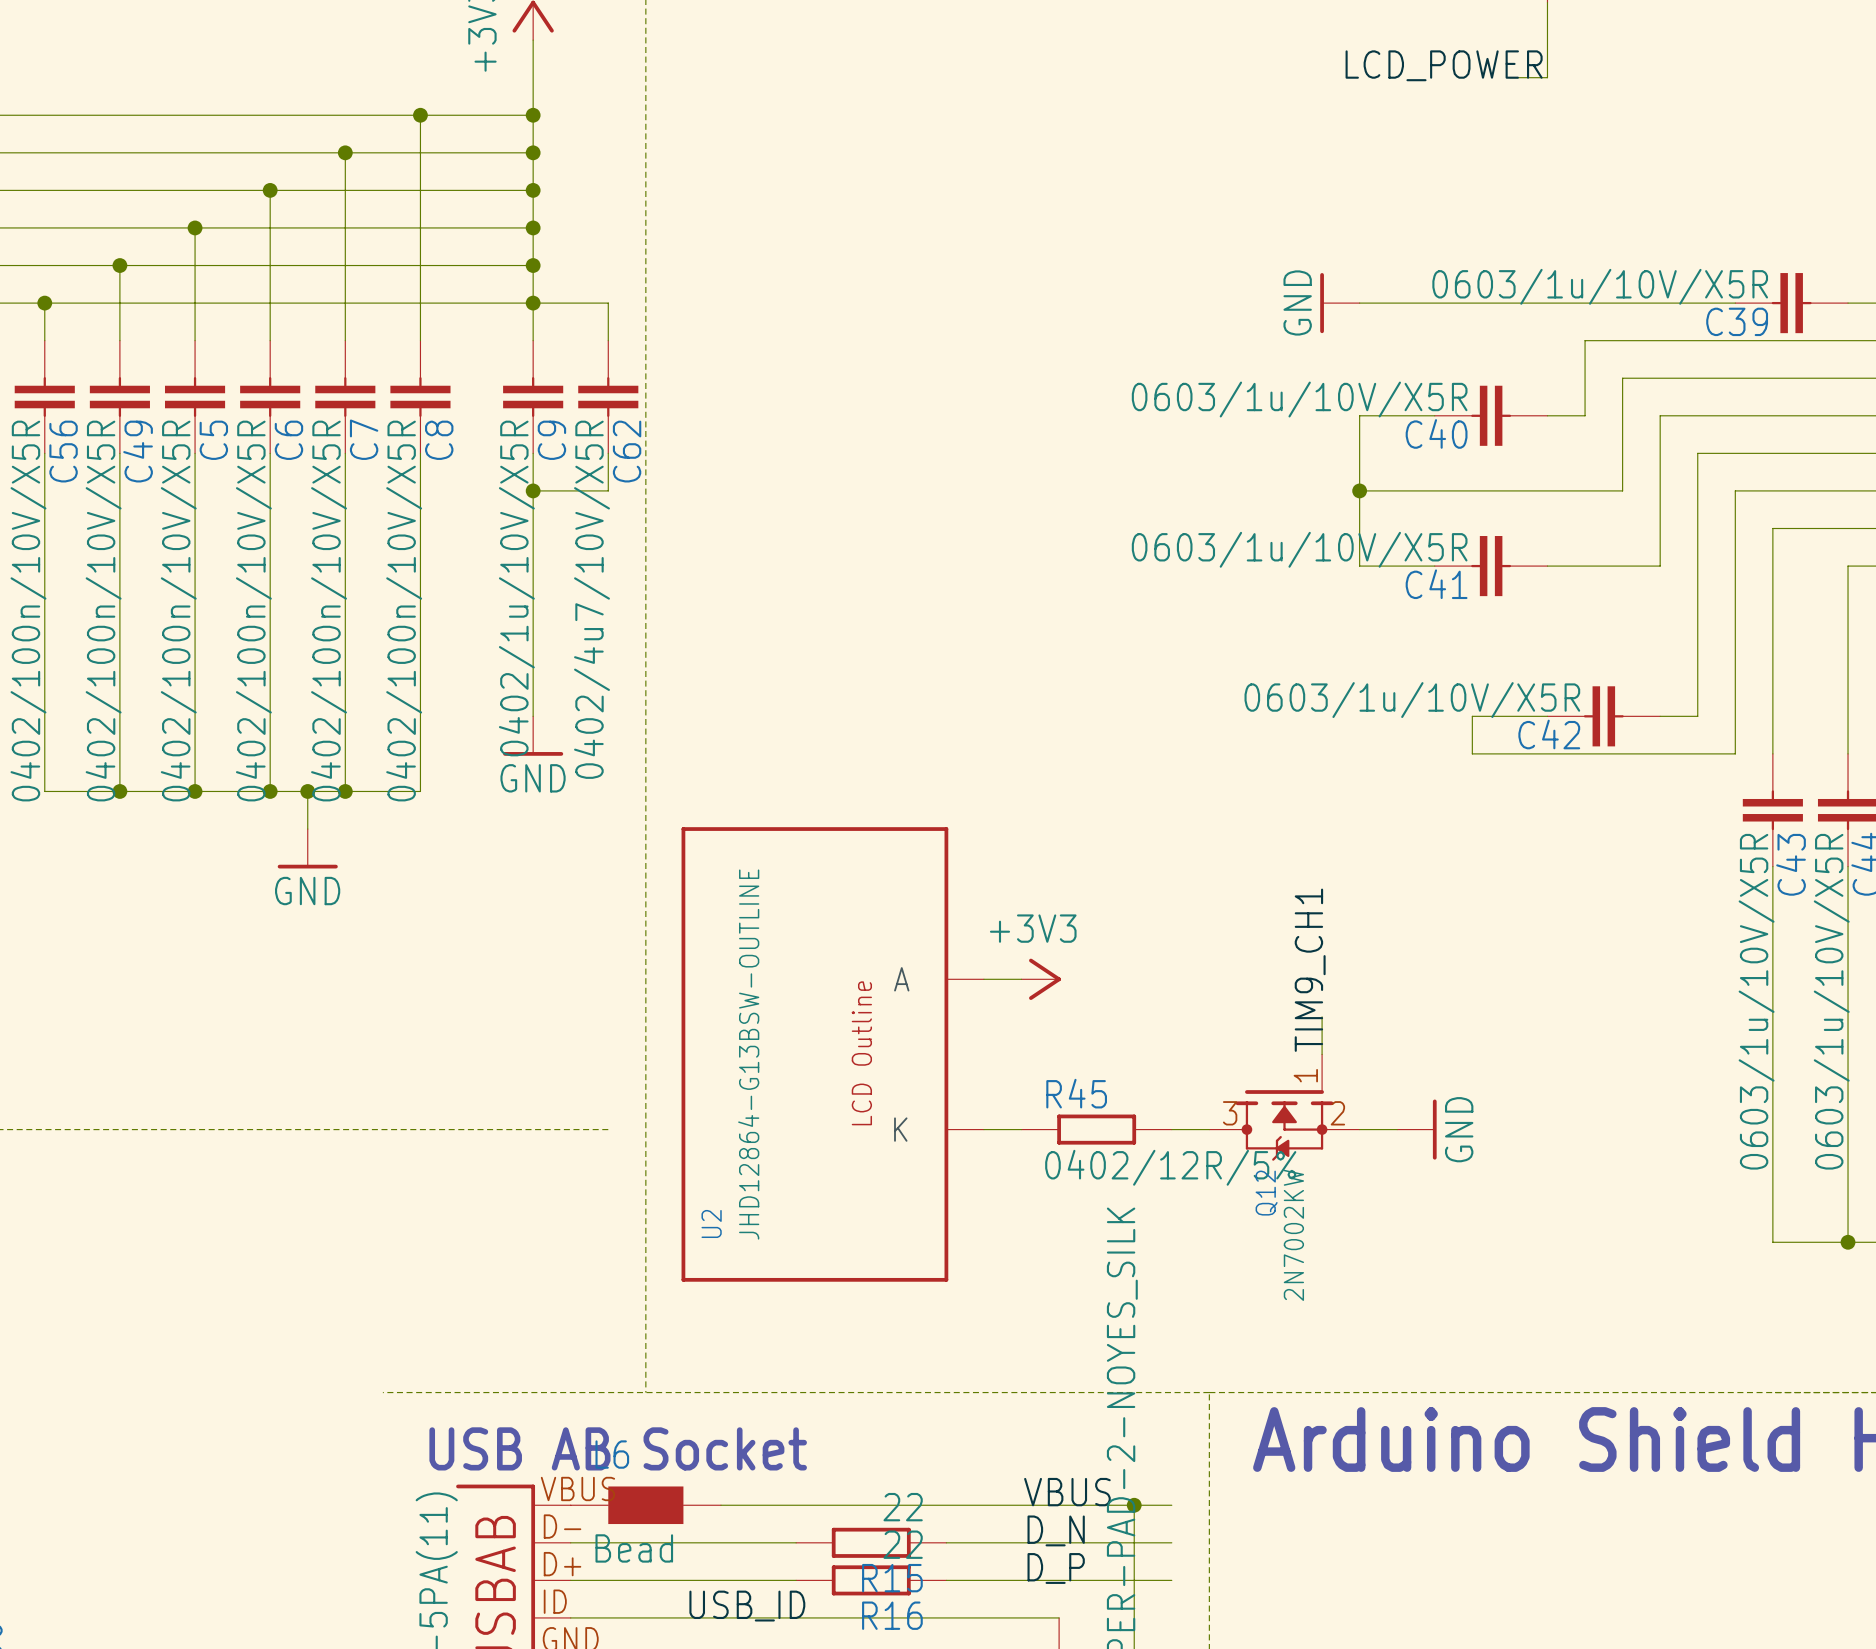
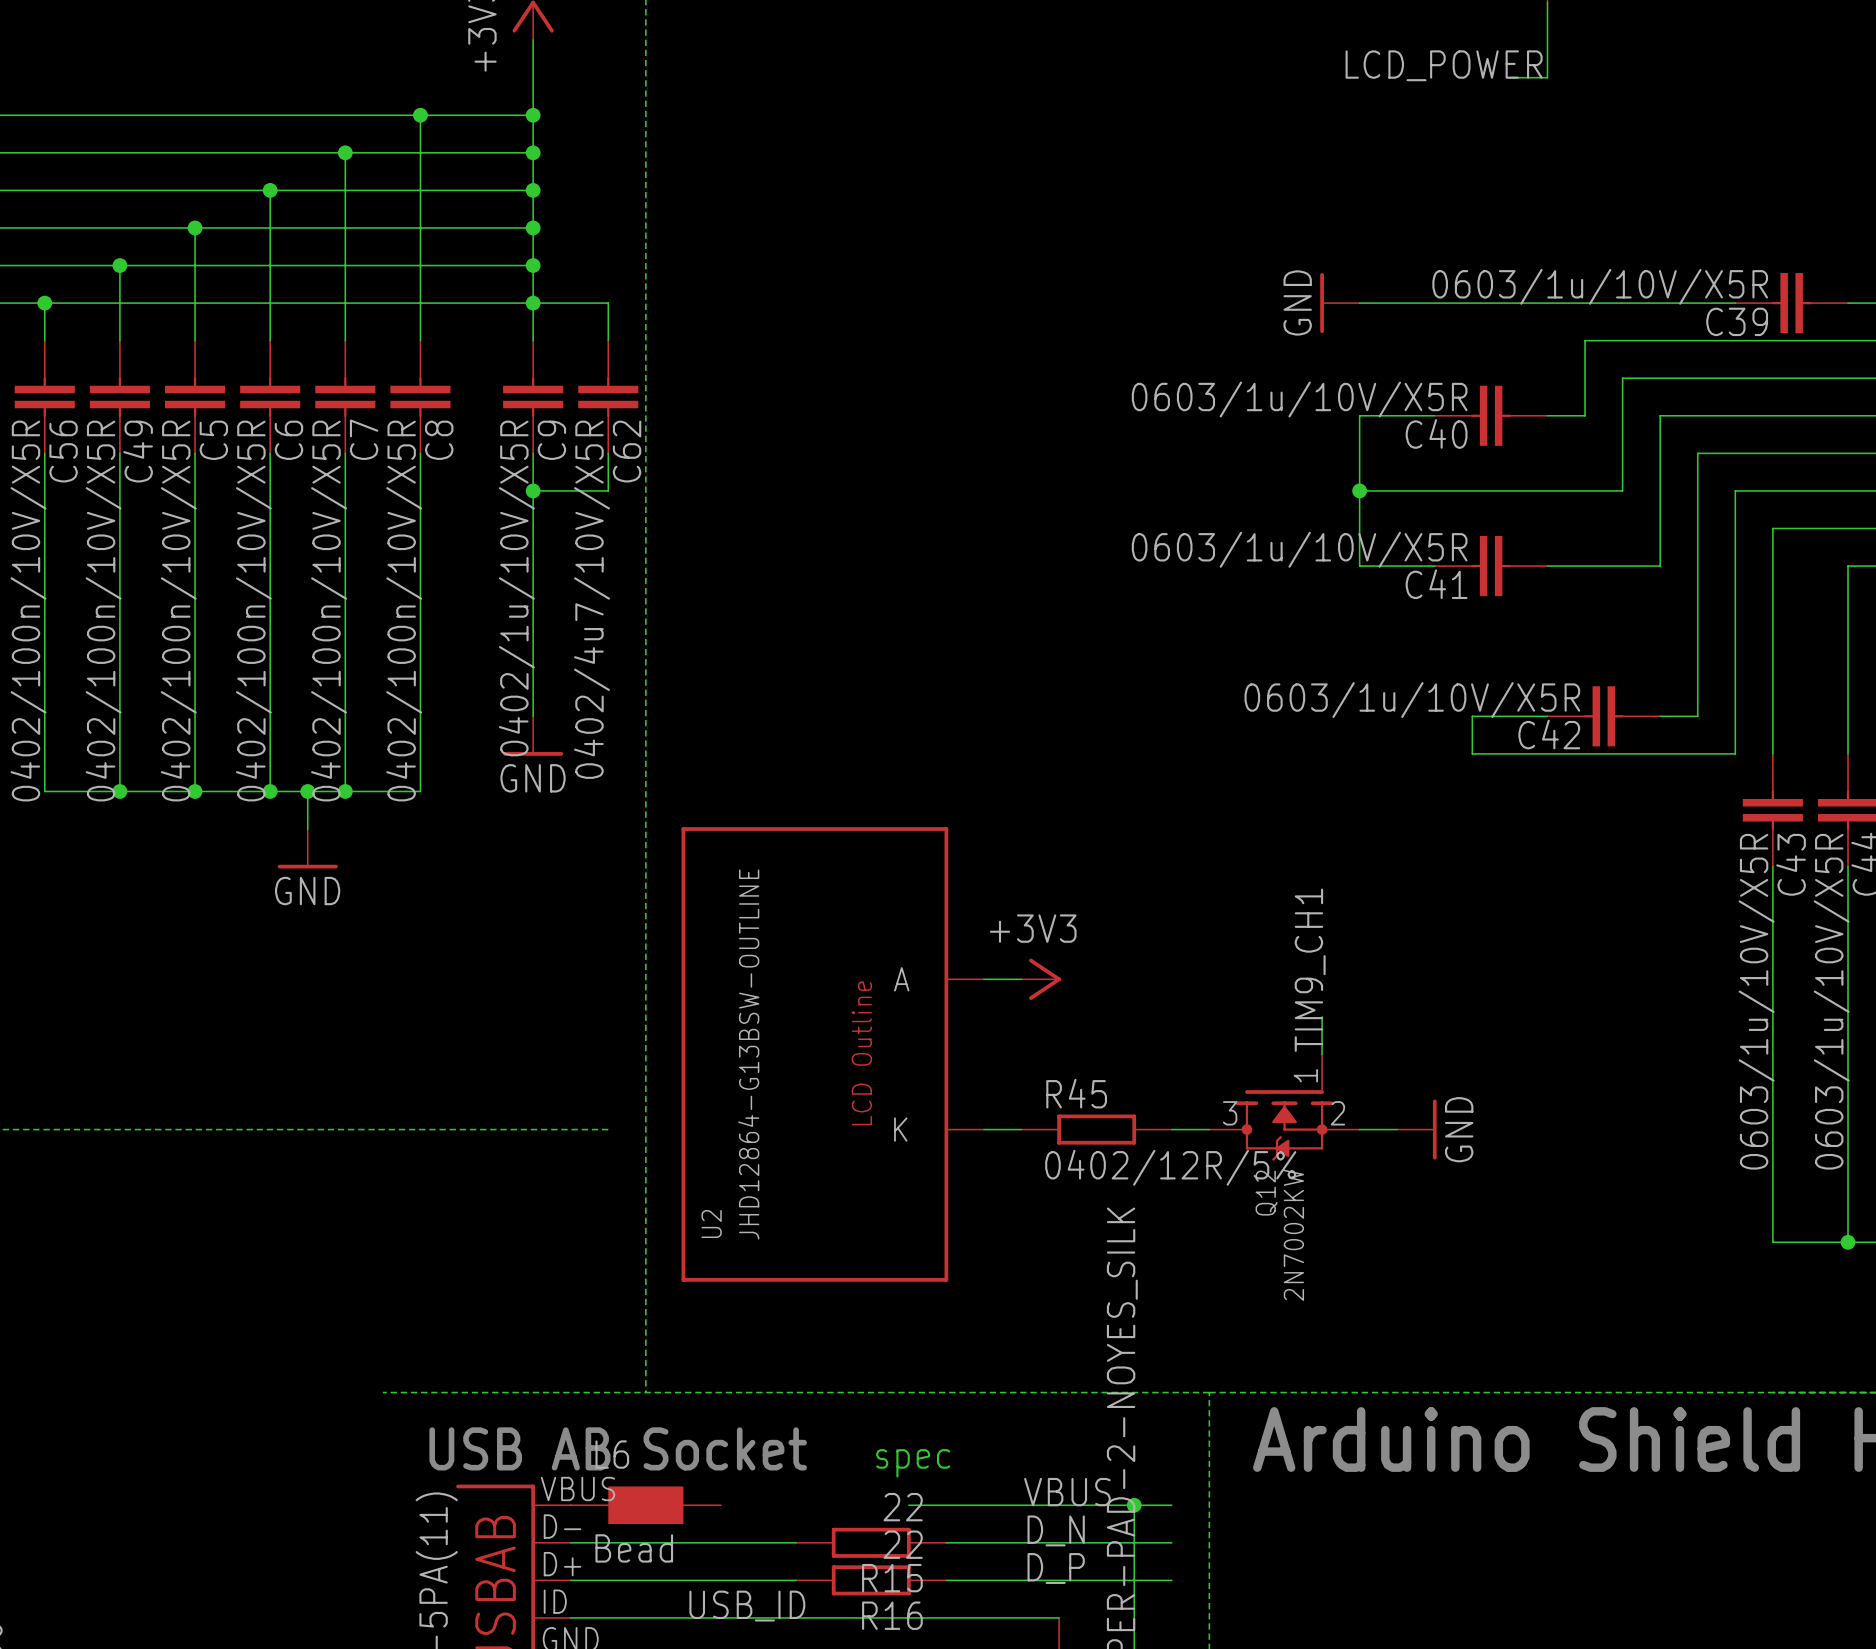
text: none -> spec (913, 1463)
wire: (720, 1505) (908, 1505) -> none

